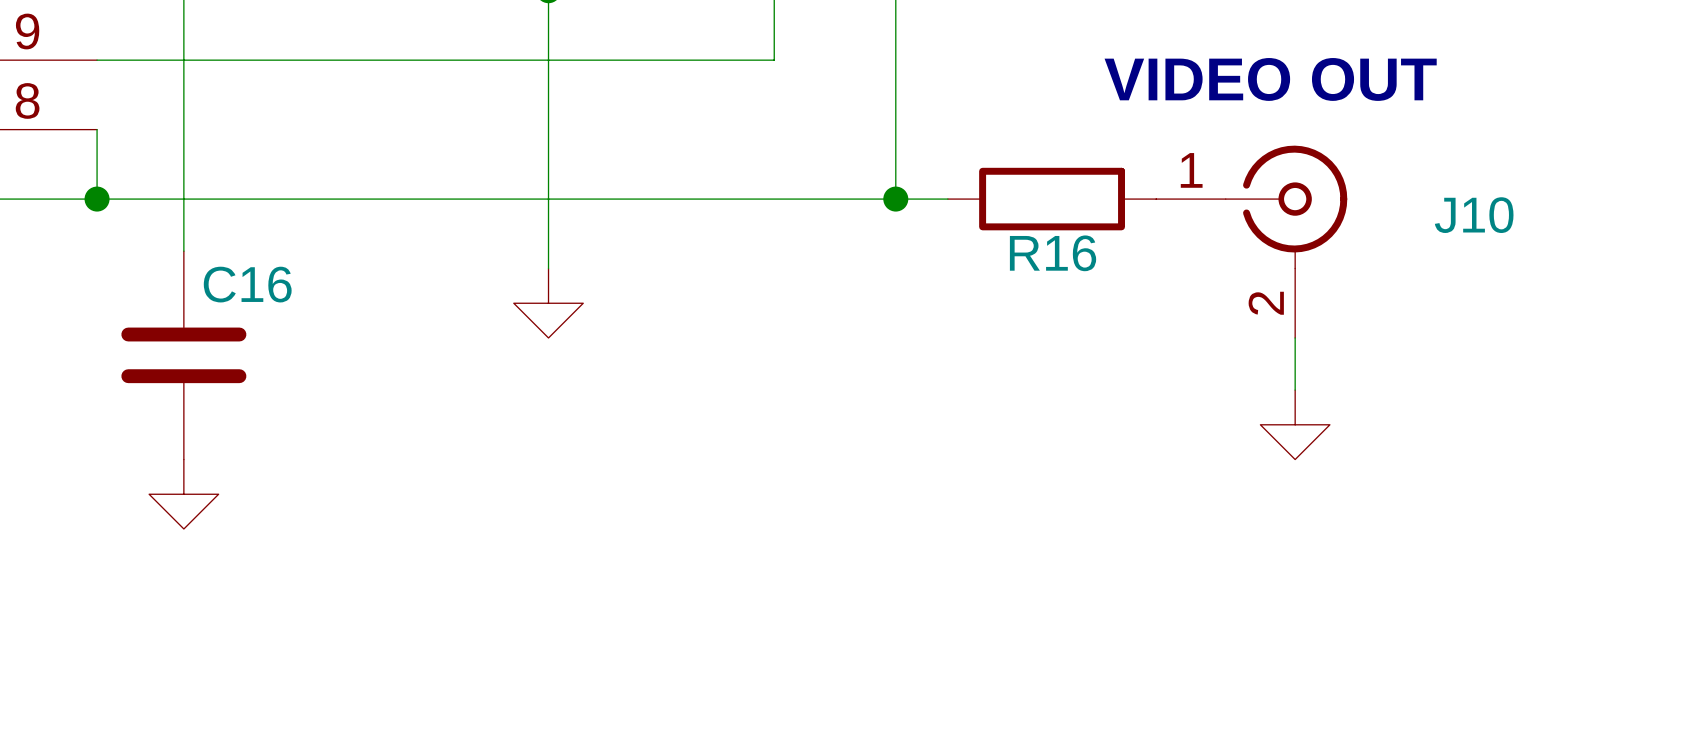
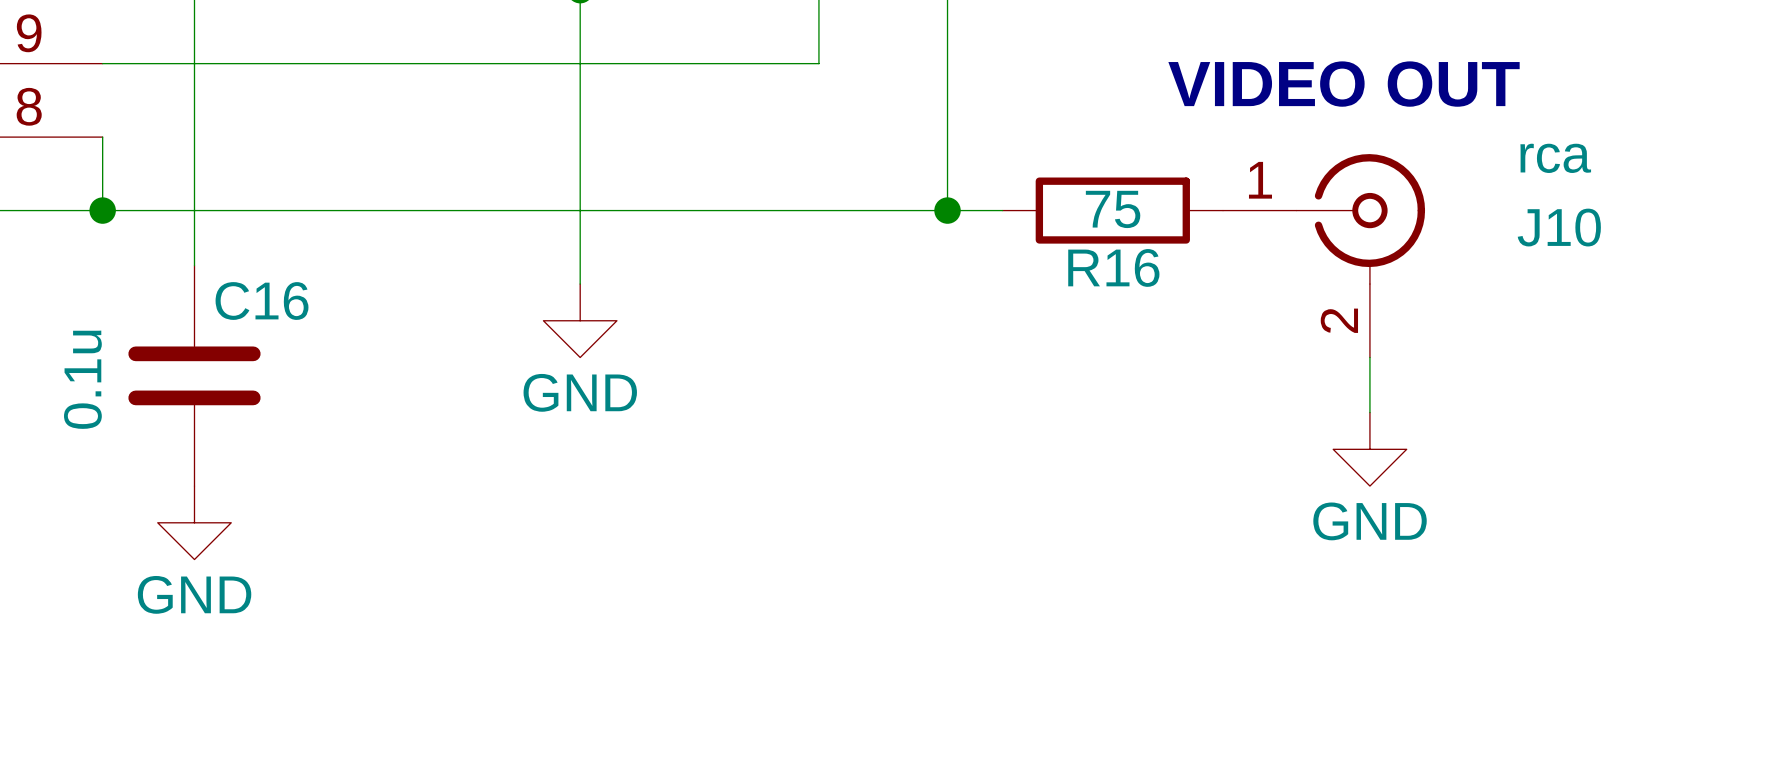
J10 value: none -> rca (1555, 158)
R16 value: none -> 75 (1113, 209)
C16 value: none -> 0.1u (82, 379)
power symbol text: none -> GND (580, 392)
power symbol text: none -> GND (1370, 521)
power symbol text: none -> GND (194, 594)

